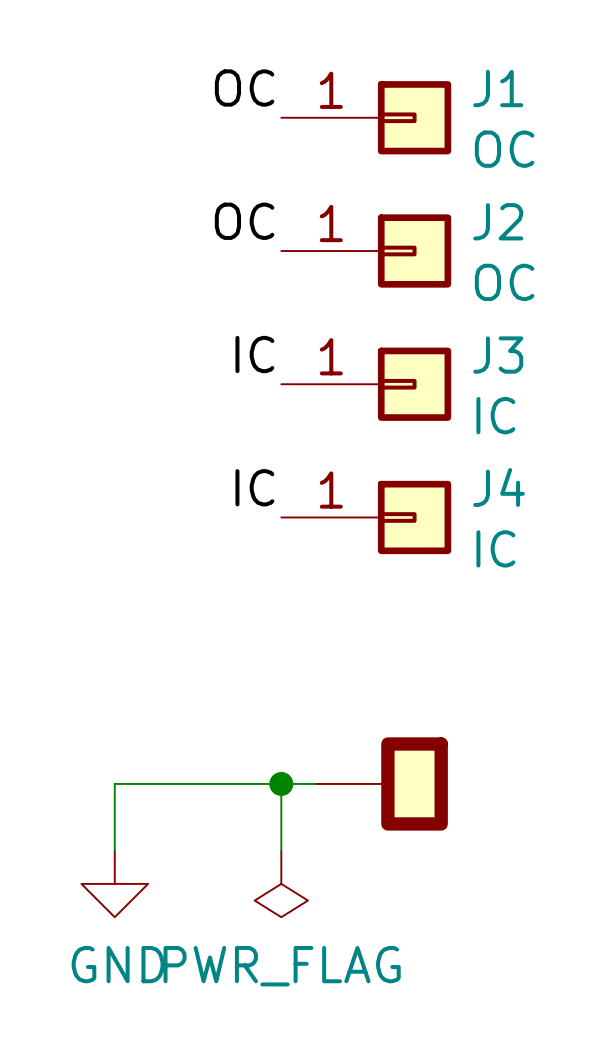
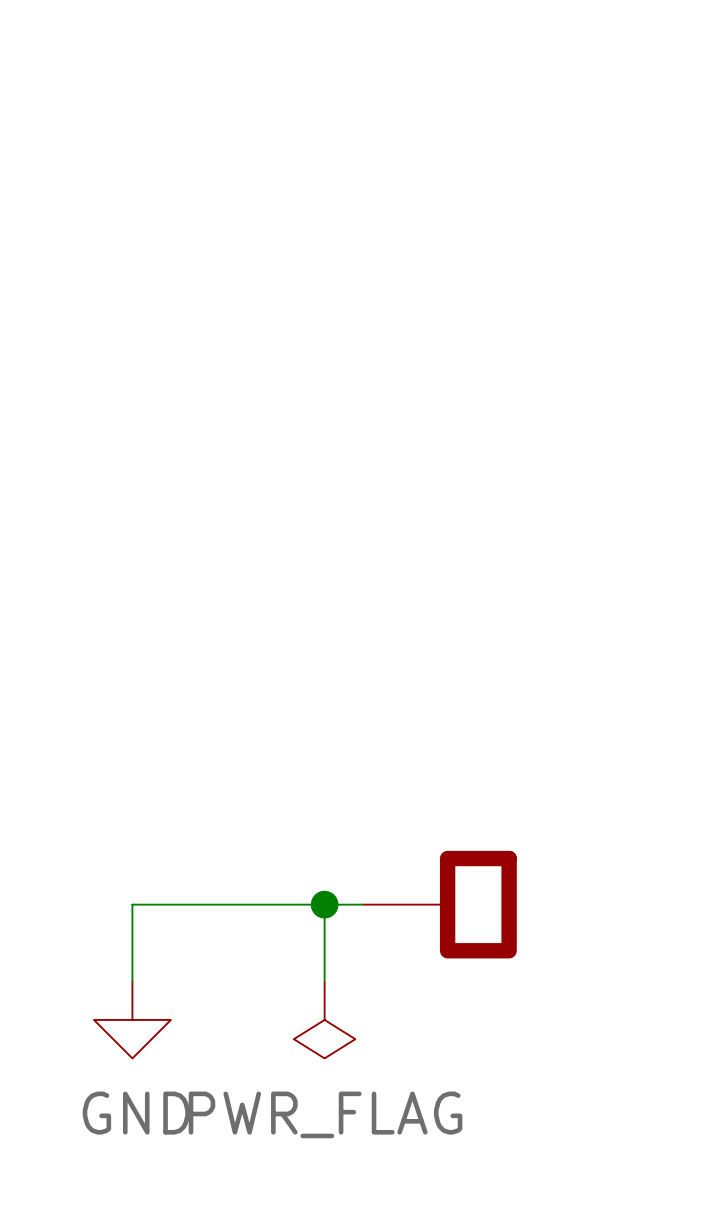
label: OC (244, 88) -> none
J1: OC (366, 117) -> none
label: OC (244, 221) -> none
J2: OC (366, 251) -> none
label: IC (254, 354) -> none
J3: IC (366, 384) -> none
label: IC (254, 487) -> none
J4: IC (366, 517) -> none

